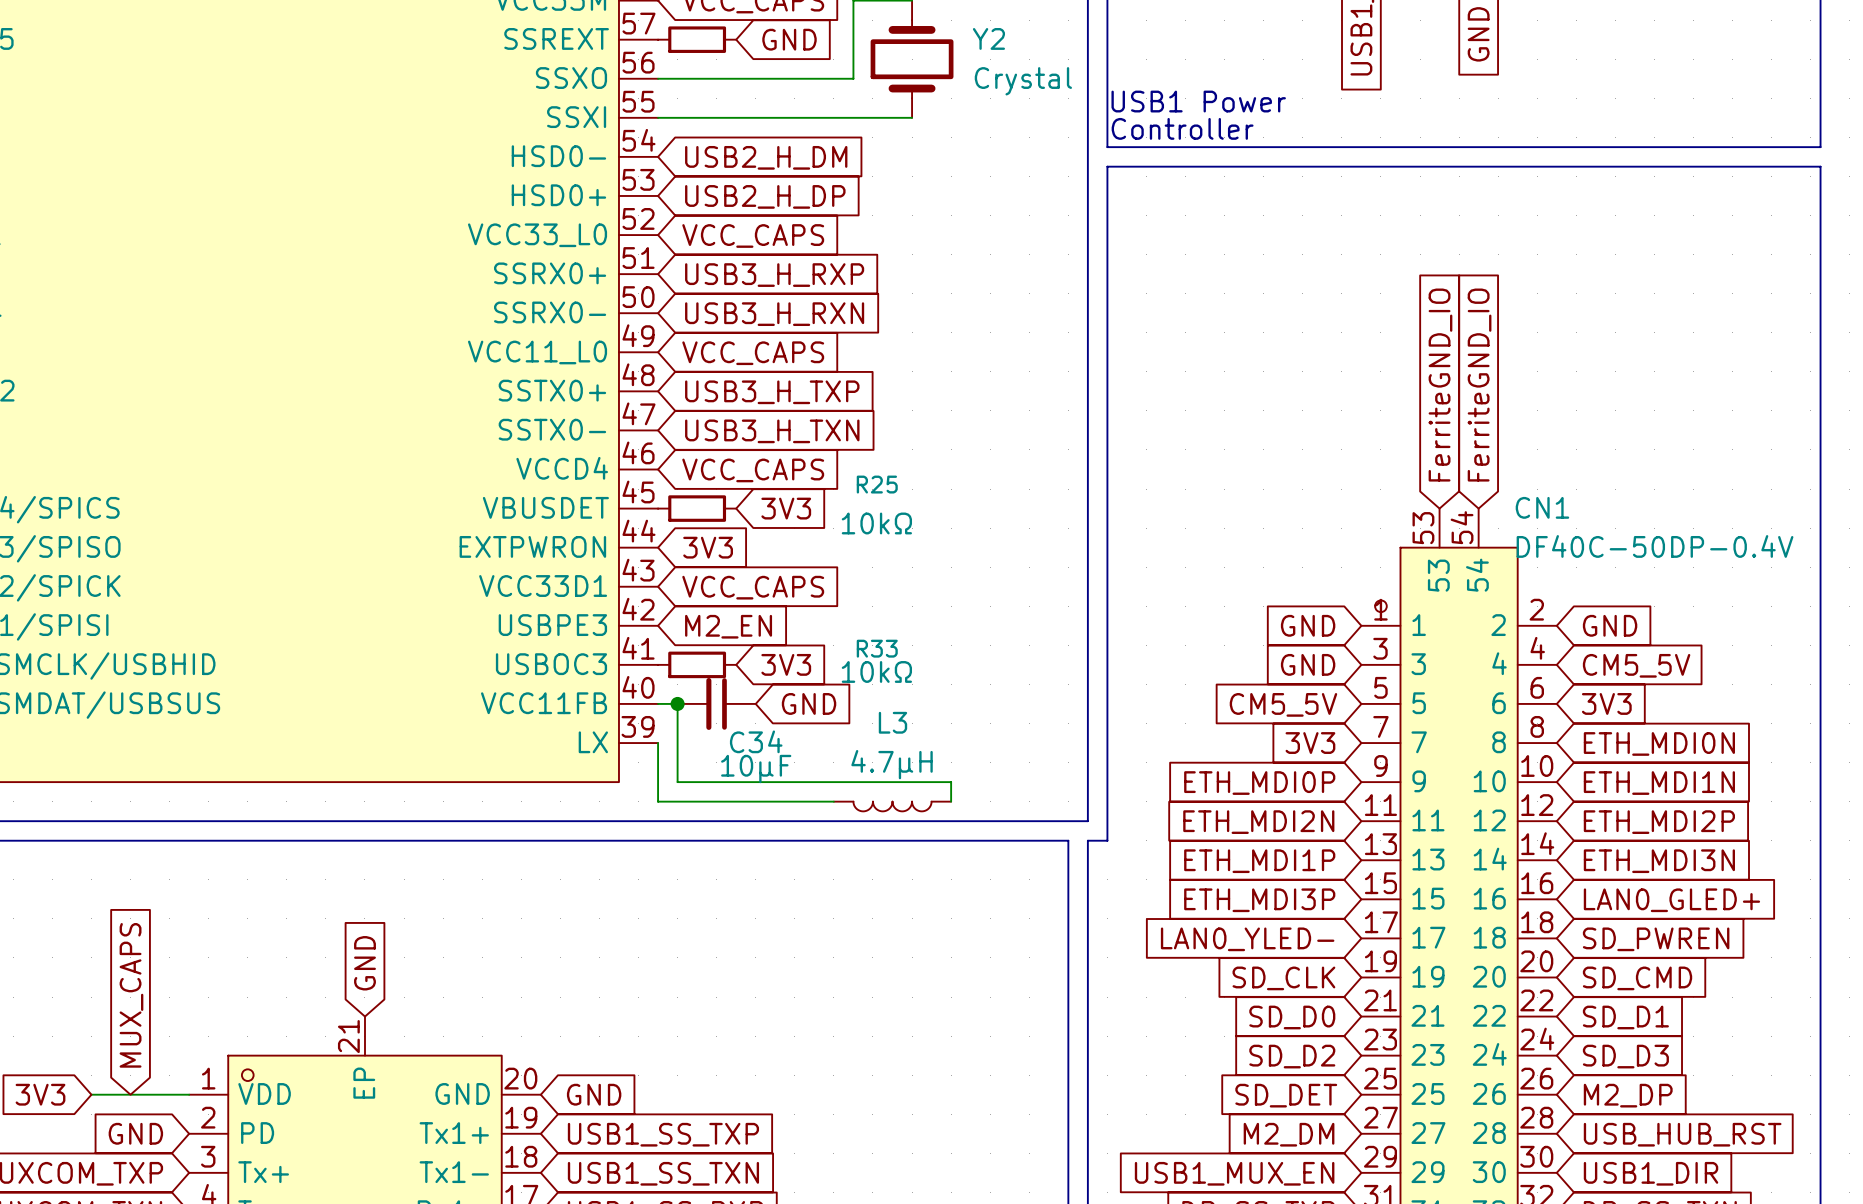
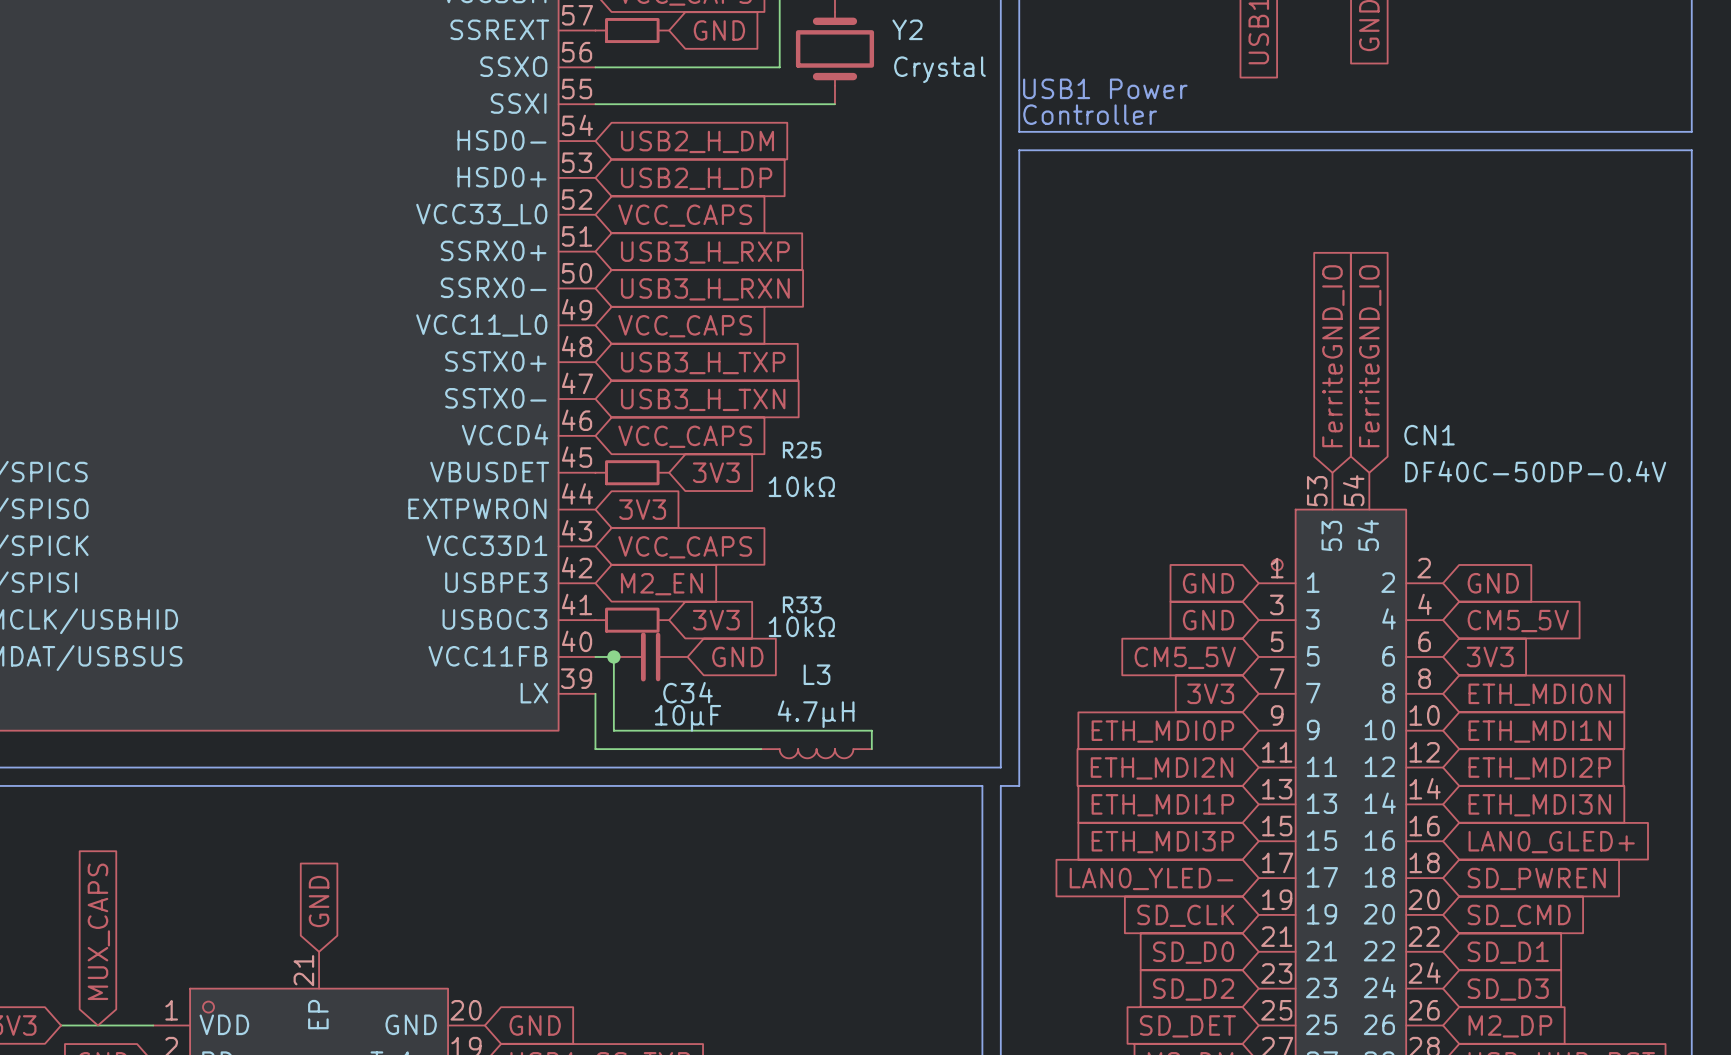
CN1 name position: CN1 (1542, 507) -> CN1 (1429, 435)
CN1 value position: DF40C-50DP-0.4V (1655, 546) -> DF40C-50DP-0.4V (1535, 471)

